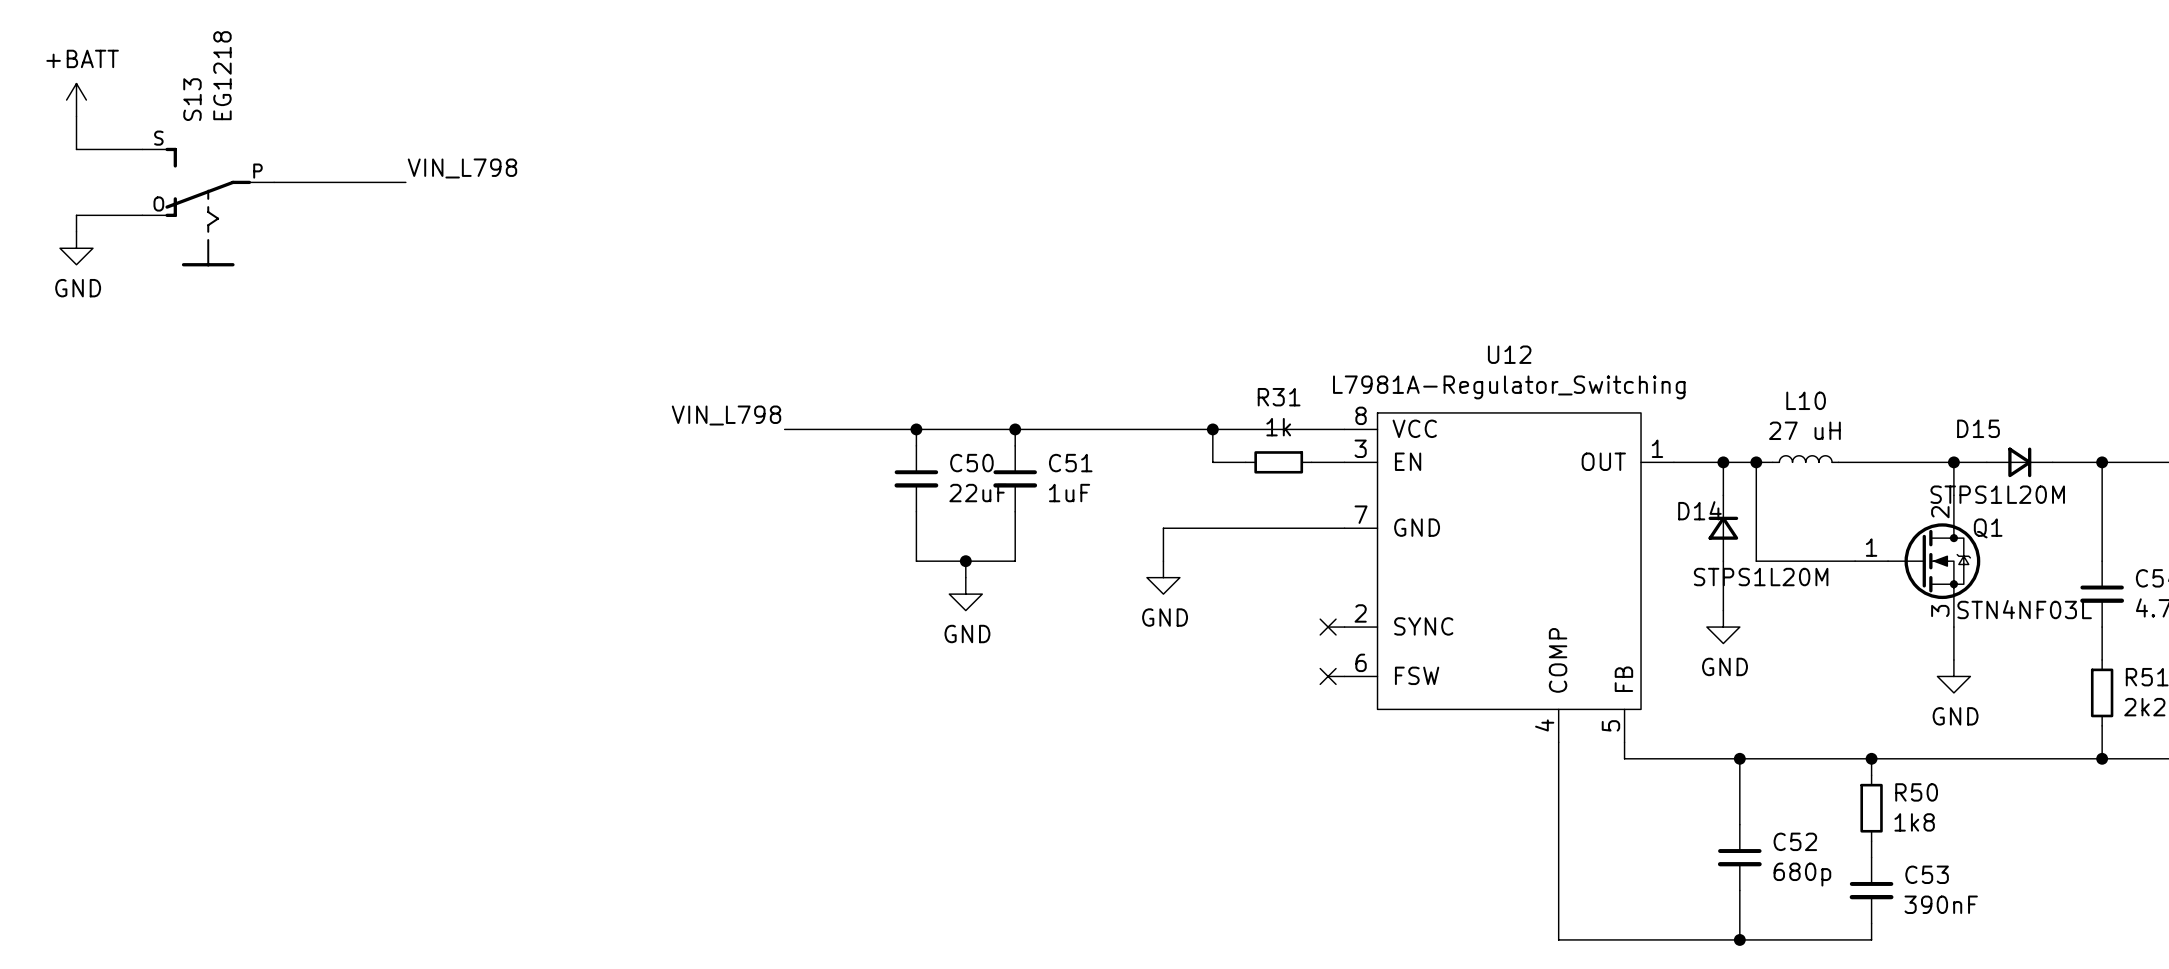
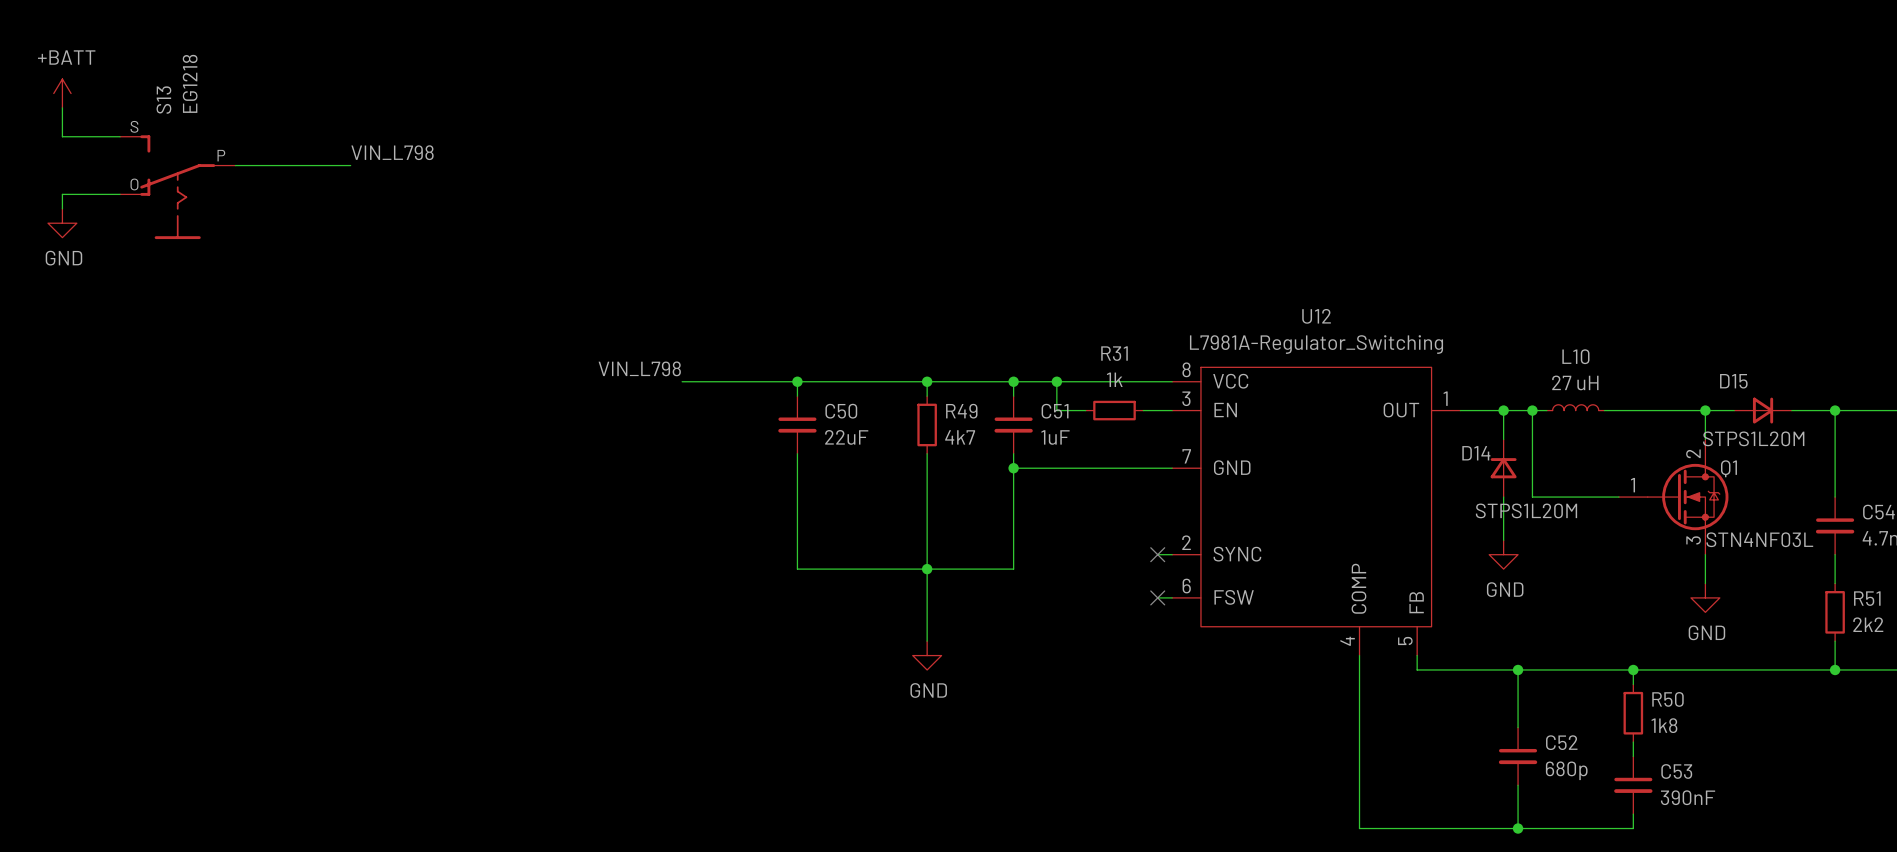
wire: (1015, 429) (1015, 445) -> (927, 381) (927, 396)
junction position: (1015, 429) -> (927, 381)
wire: none -> (1013, 381) (1013, 396)
junction: none -> (1013, 381)
C51 position: (1015, 478) -> (1013, 424)
R49: none -> 4k7 (927, 424)
wire: (1015, 511) (1015, 561) (916, 561) -> (1013, 497) (1013, 569) (797, 569) (797, 497)
wire: none -> (927, 453) (927, 641)
junction: none -> (1013, 468)
wire: (965, 561) (965, 577) -> (1013, 453) (1013, 468)
junction: (965, 561) -> none
power symbol: GND (1163, 577) -> none
power symbol: GND (965, 594) -> none
junction: none -> (927, 569)
power symbol: none -> GND (927, 655)

